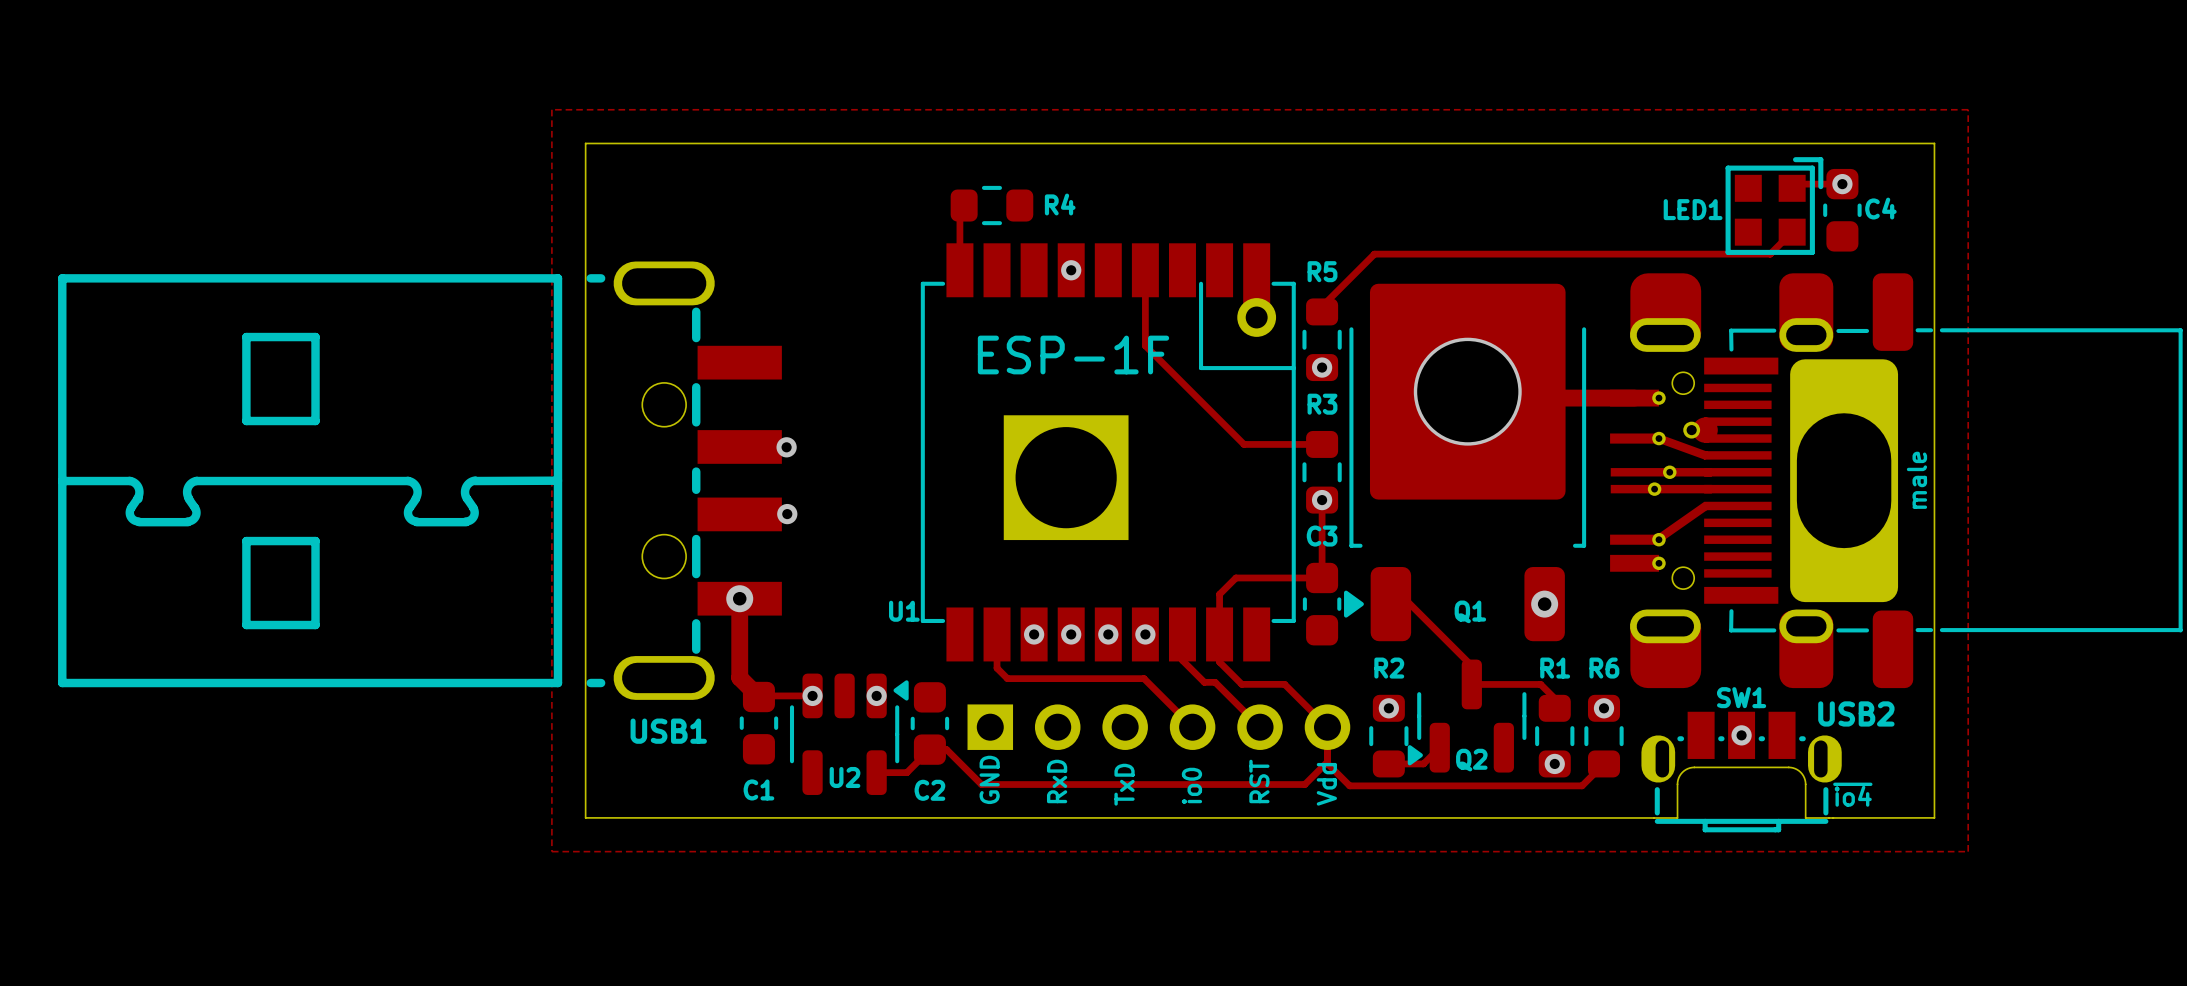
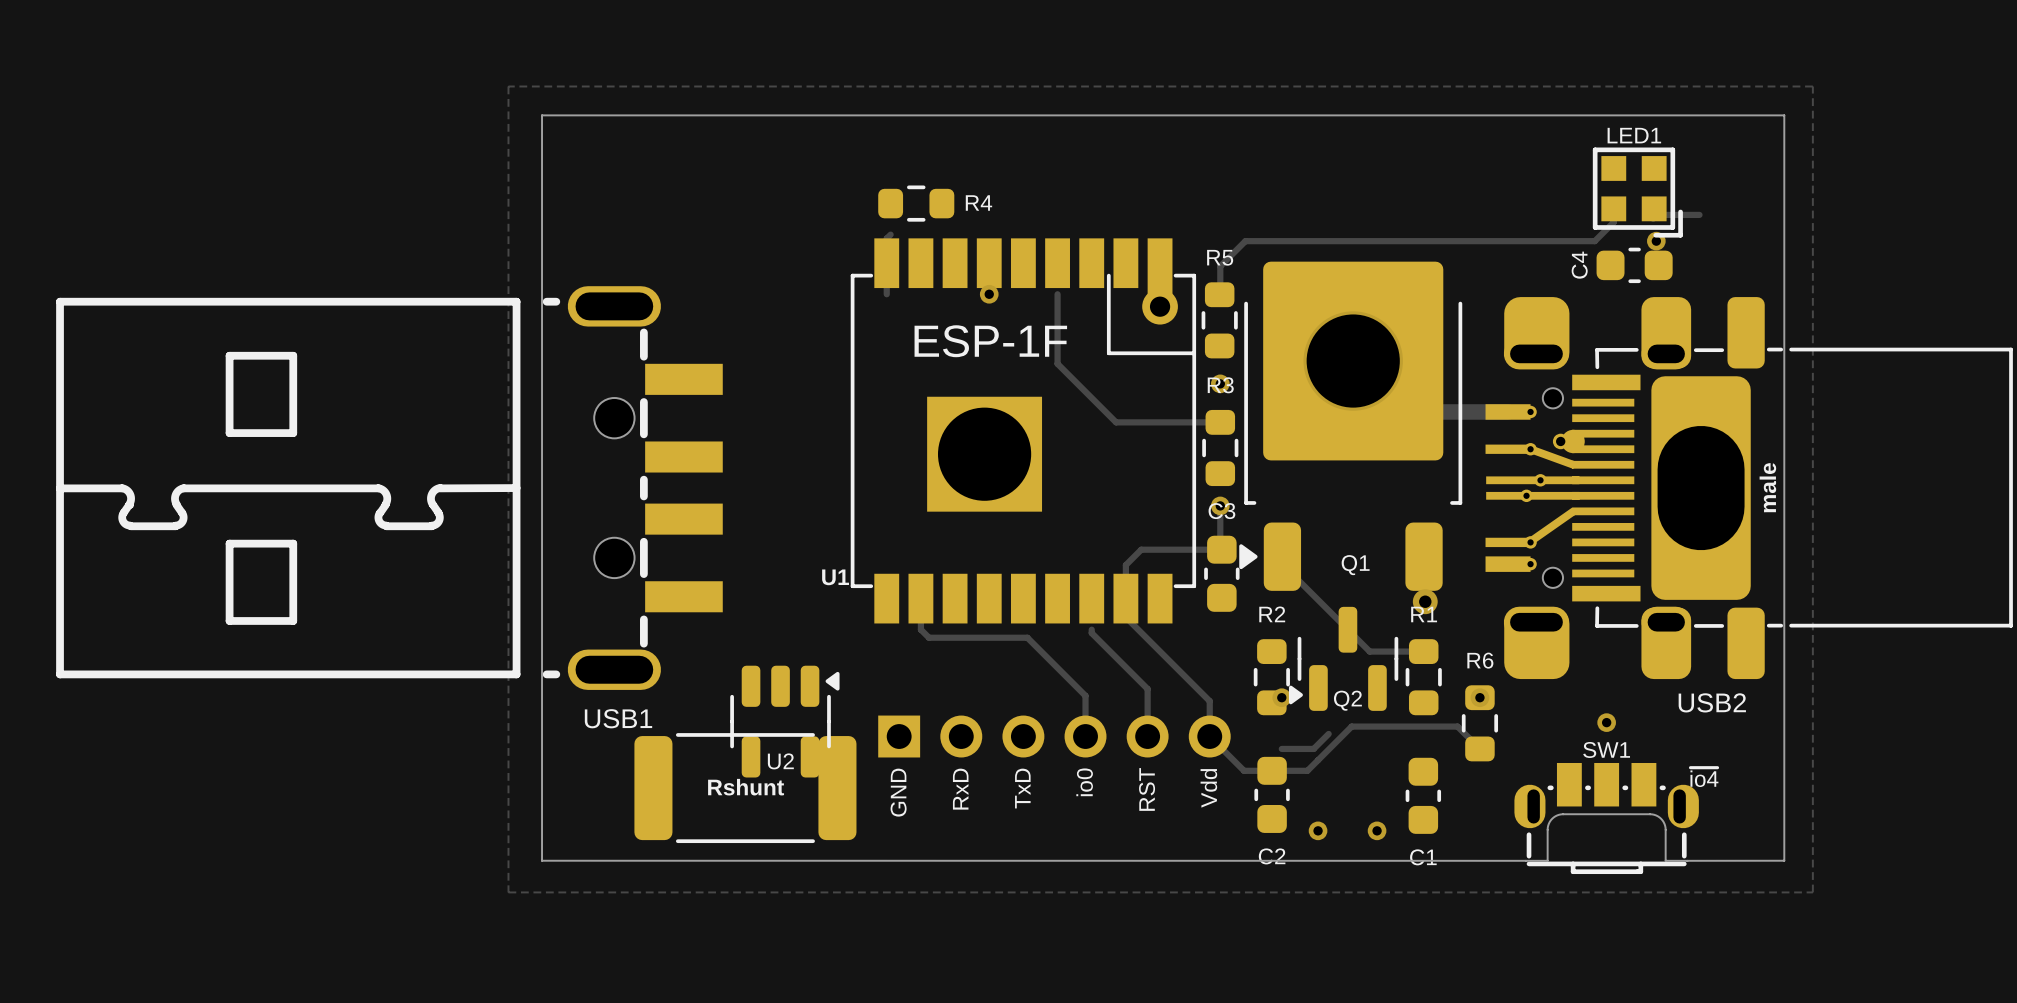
zone outline: (551, 109) (1968, 109) (1968, 851) (551, 851) (551, 109) -> (508, 86) (508, 892) (1812, 892) (1812, 86) (508, 86)
board edge: (585, 143) (1934, 143) -> (542, 177) (542, 115) (1784, 115) (1784, 177)
track: none -> (1613, 208) (1613, 222) (1594, 241) (1245, 241) (1220, 266) (1219, 294)
via position: (1842, 184) -> (1656, 241)
R4 position: (991, 205) -> (916, 203)
LED1 rotation: 0° (1774, 206) -> 90° clockwise (1637, 192)
C4 name position: C4 (1880, 208) -> C4 (1579, 265)
C4 rotation: 0° (1842, 210) -> 90° clockwise (1634, 265)
C4 position: (1842, 210) -> (1634, 265)
track: (1792, 232) (1770, 254) (1374, 254) (1322, 306) (1322, 311) -> none
R5 position: (1322, 339) -> (1219, 320)
via position: (1467, 391) -> (1353, 361)
track: (1208, 409) (1244, 444) (1322, 444) -> (1116, 422) (1220, 422)
via: (786, 447) -> none
U1 position: (1108, 452) -> (1023, 430)
Q1 position: (1465, 462) -> (1350, 426)
R3 position: (1322, 472) -> (1220, 447)
via: (787, 514) -> none
track: (1322, 545) (1322, 577) (1235, 577) (1219, 594) -> (1220, 548) (1221, 549) (1141, 549) (1125, 565) (1125, 592)
track: none -> (1282, 556) (1282, 564) (1369, 651) (1423, 651)
track: (739, 598) (739, 677) (758, 697) (812, 695) -> none
via: (739, 598) -> none
track: none -> (920, 598) (920, 629) (928, 637) (1027, 637) (1085, 695) (1085, 736)
C3 position: (1322, 604) -> (1221, 573)
track: (1390, 604) (1398, 596) (1402, 596) (1471, 665) (1471, 684) (1540, 684) (1554, 698) (1554, 708) -> none
track: (1219, 621) (1219, 662) (1241, 684) (1284, 684) (1327, 727) (1327, 763) (1349, 785) (1582, 785) (1604, 763) -> (1125, 617) (1209, 701) (1209, 736) (1244, 770) (1307, 770) (1351, 726) (1457, 726) (1479, 748)
track: (997, 634) (997, 668) (1007, 678) (1144, 678) (1192, 727) -> none
via: (1034, 634) -> none
via: (1071, 634) -> none
via: (1108, 634) -> none
via: (1145, 634) -> none
track: (1182, 638) (1182, 660) (1204, 682) (1215, 682) (1260, 727) -> (1091, 633) (1147, 689) (1147, 736)
via: (812, 695) -> none
via: (876, 695) -> none
Q2 position: (1467, 716) -> (1343, 658)
C1 position: (758, 723) -> (1423, 795)
C2 position: (929, 723) -> (1272, 794)
part position: (1158, 727) -> (1054, 736)
R2 position: (1388, 736) -> (1271, 677)
R1 position: (1554, 736) -> (1423, 677)
track: (1327, 761) (1304, 784) (981, 784) (946, 749) (929, 749) (906, 772) (876, 772) -> none
via: (1554, 763) -> none
SW1 position: (1741, 772) -> (1606, 818)
text position: GND (989, 779) -> GND (898, 792)
text position: RxD (1057, 781) -> RxD (960, 789)
text position: RST (1259, 781) -> RST (1147, 789)
text position: TxD (1124, 784) -> TxD (1022, 788)
text position: Vdd (1326, 784) -> Vdd (1208, 788)
text position: io0 (1191, 785) -> io0 (1084, 782)
Rshunt: none -> (745, 788)
board edge: (585, 817) (1653, 817) -> (542, 798) (542, 860) (1525, 860)
board edge: (1829, 817) (1934, 817) -> (1687, 860) (1784, 860) (1784, 798)
via: none -> (1318, 830)
via: none -> (1377, 830)

